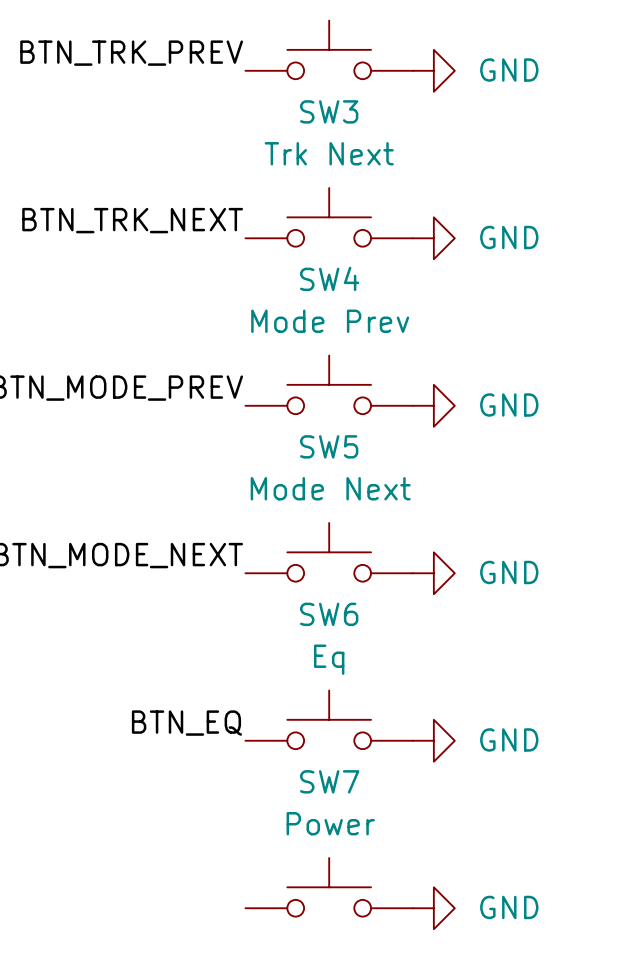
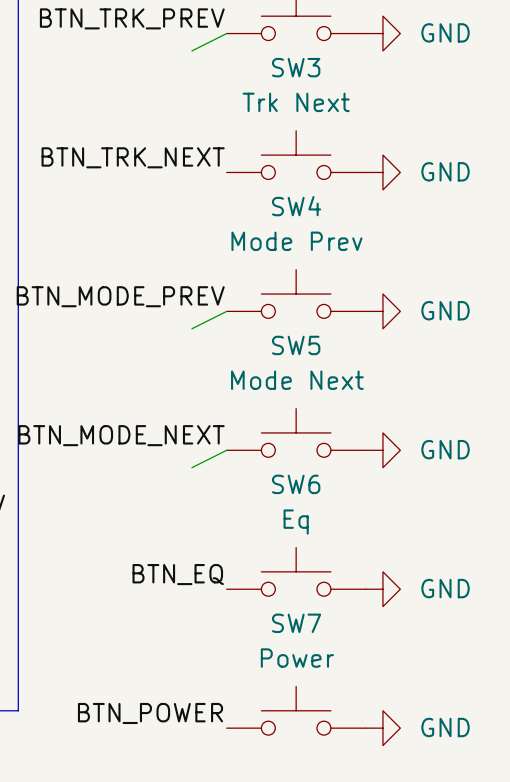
wire: none -> (226, 33) (191, 50)
wire: none -> (226, 311) (191, 328)
wire: none -> (226, 450) (191, 467)
label: none -> BTN_POWER (150, 713)

